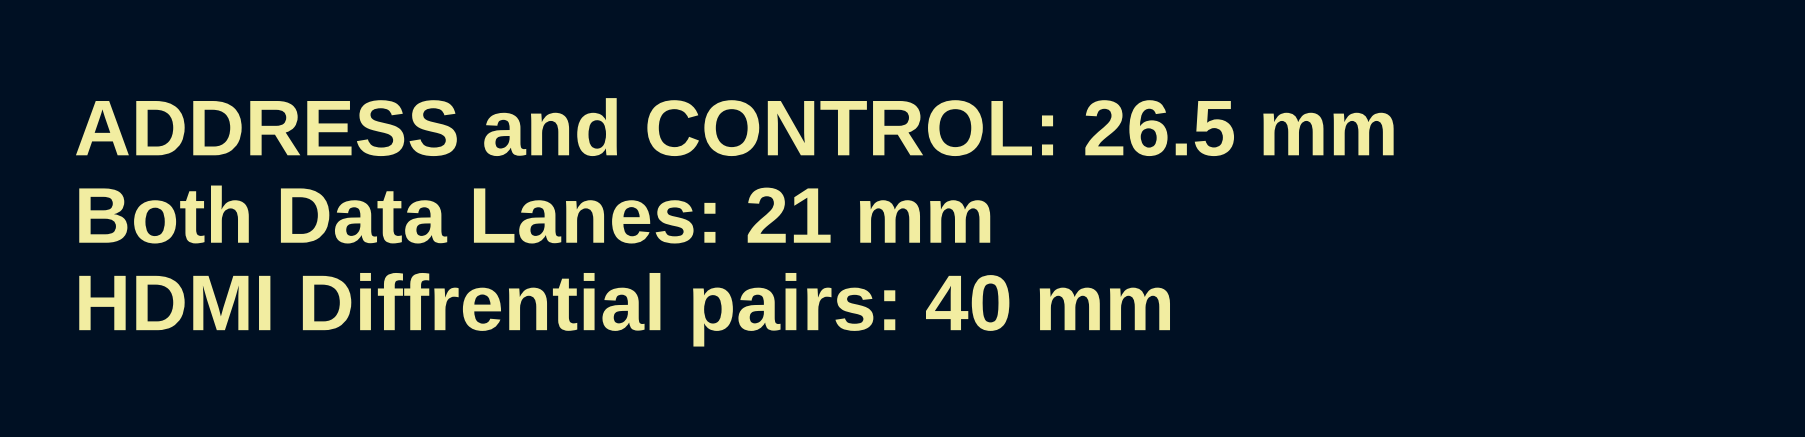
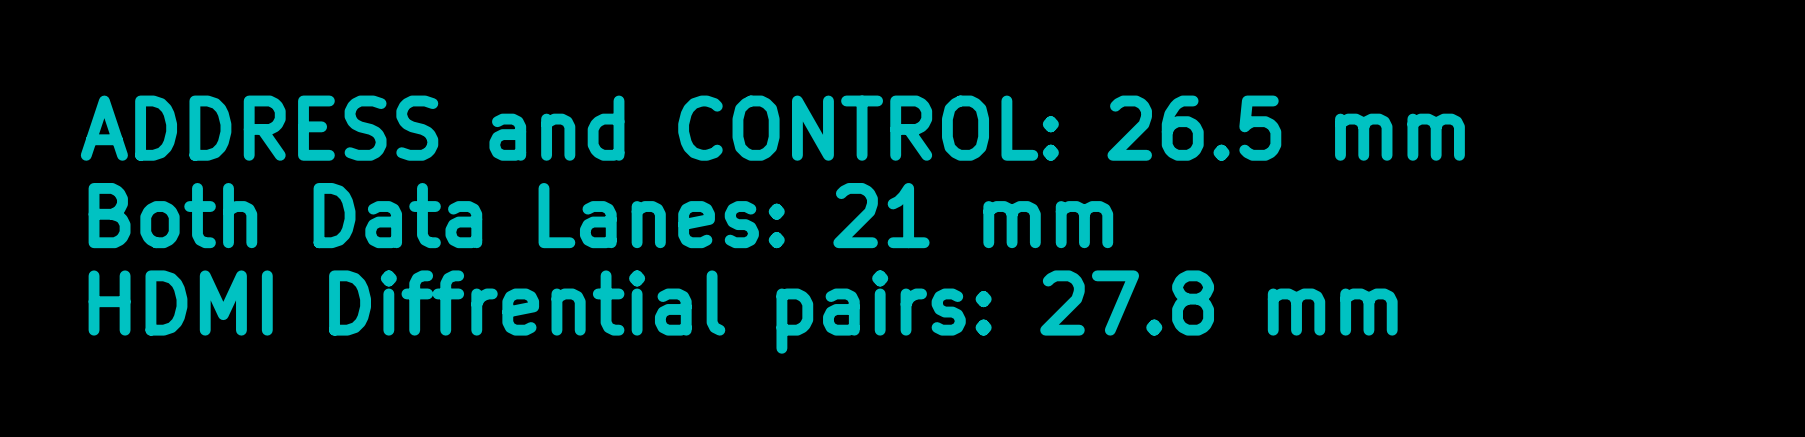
text: HDMI Diffrential pairs: 40 mm (624, 309) -> HDMI Diffrential pairs: 27.8 mm (743, 312)

